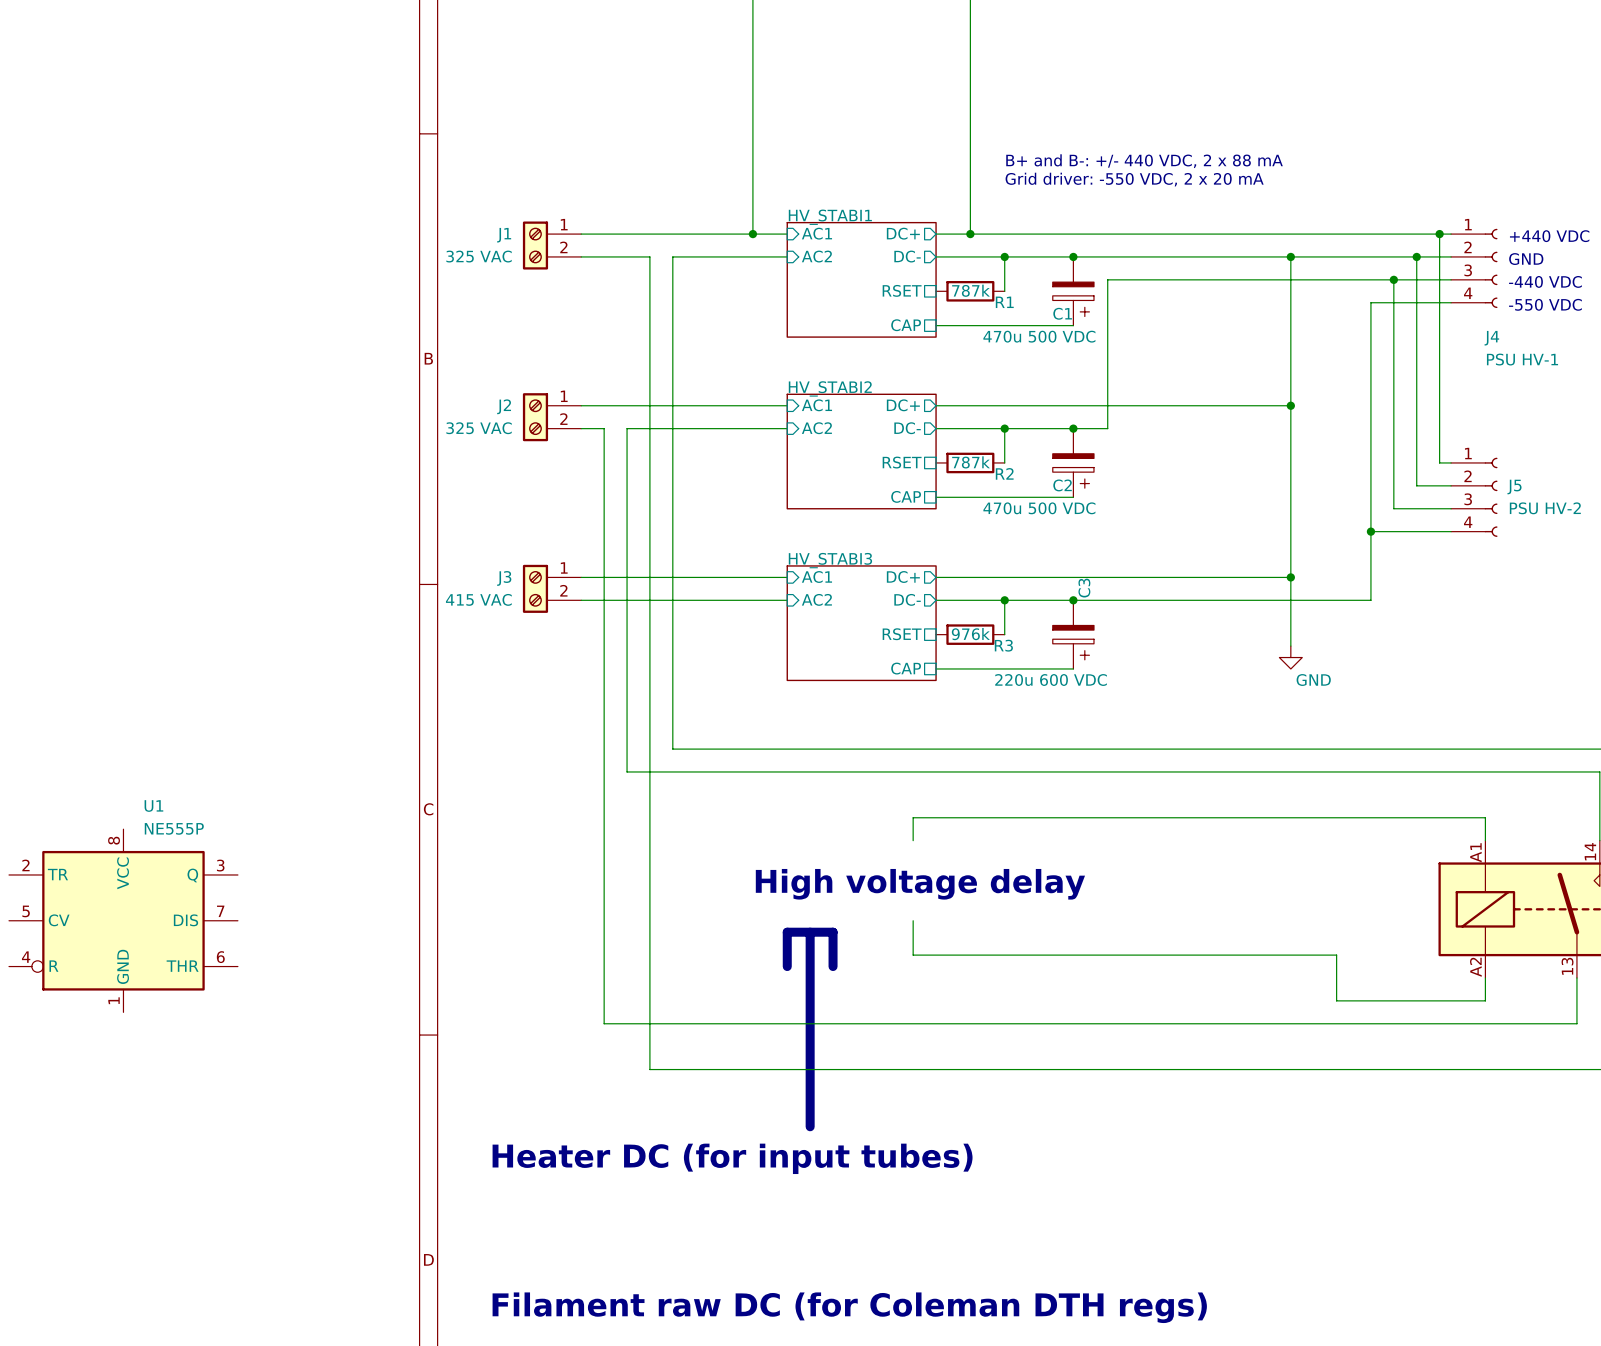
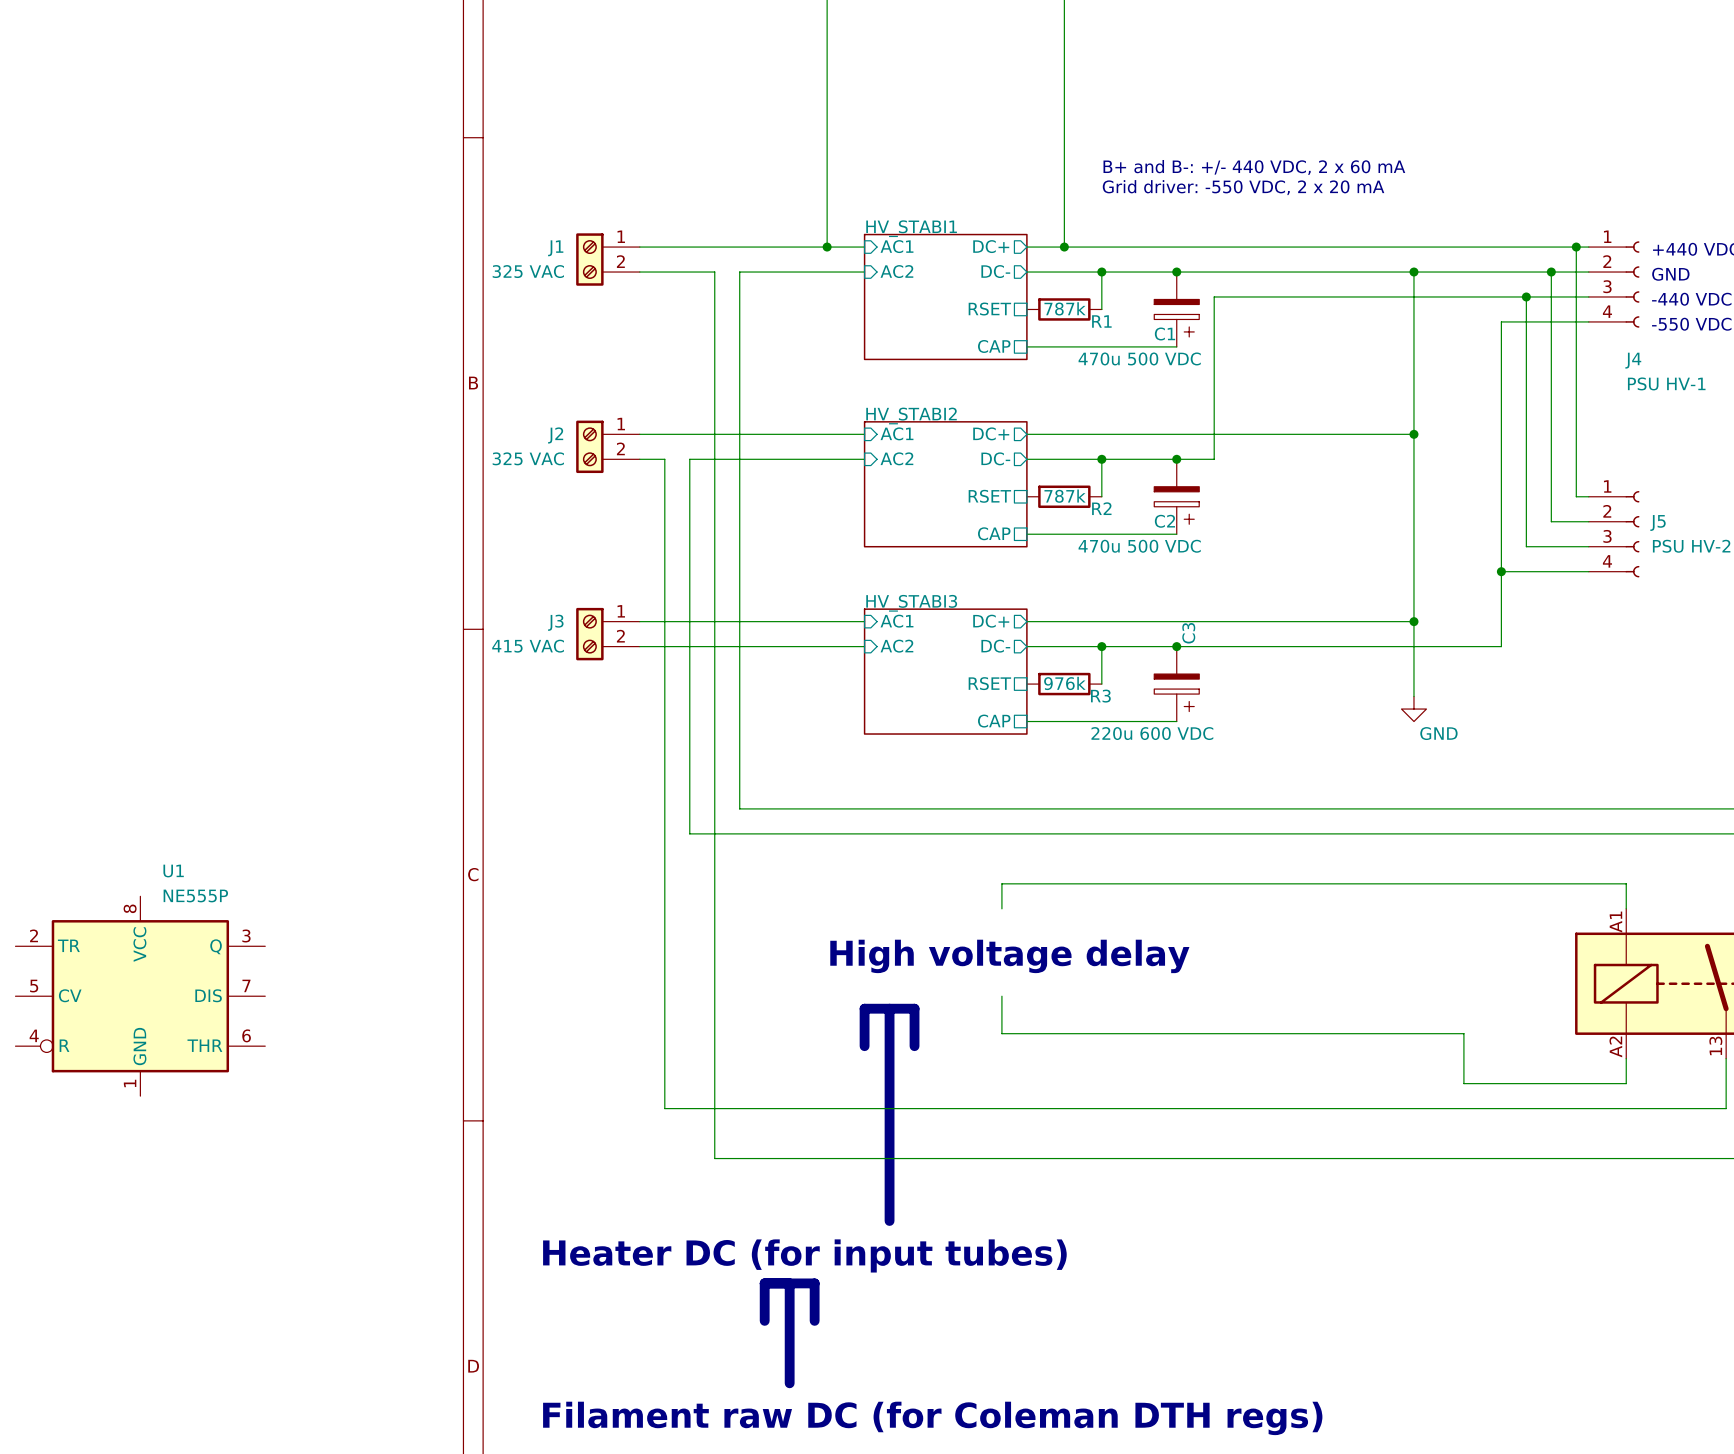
text: B+ and B-: +/- 440 VDC, 2 x 88 mA (1144, 161) -> B+ and B-: +/- 440 VDC, 2 x 60 mA (1254, 167)
line: none -> (789, 1283) (789, 1383)
line: none -> (764, 1320) (764, 1283) (814, 1283) (814, 1320)

